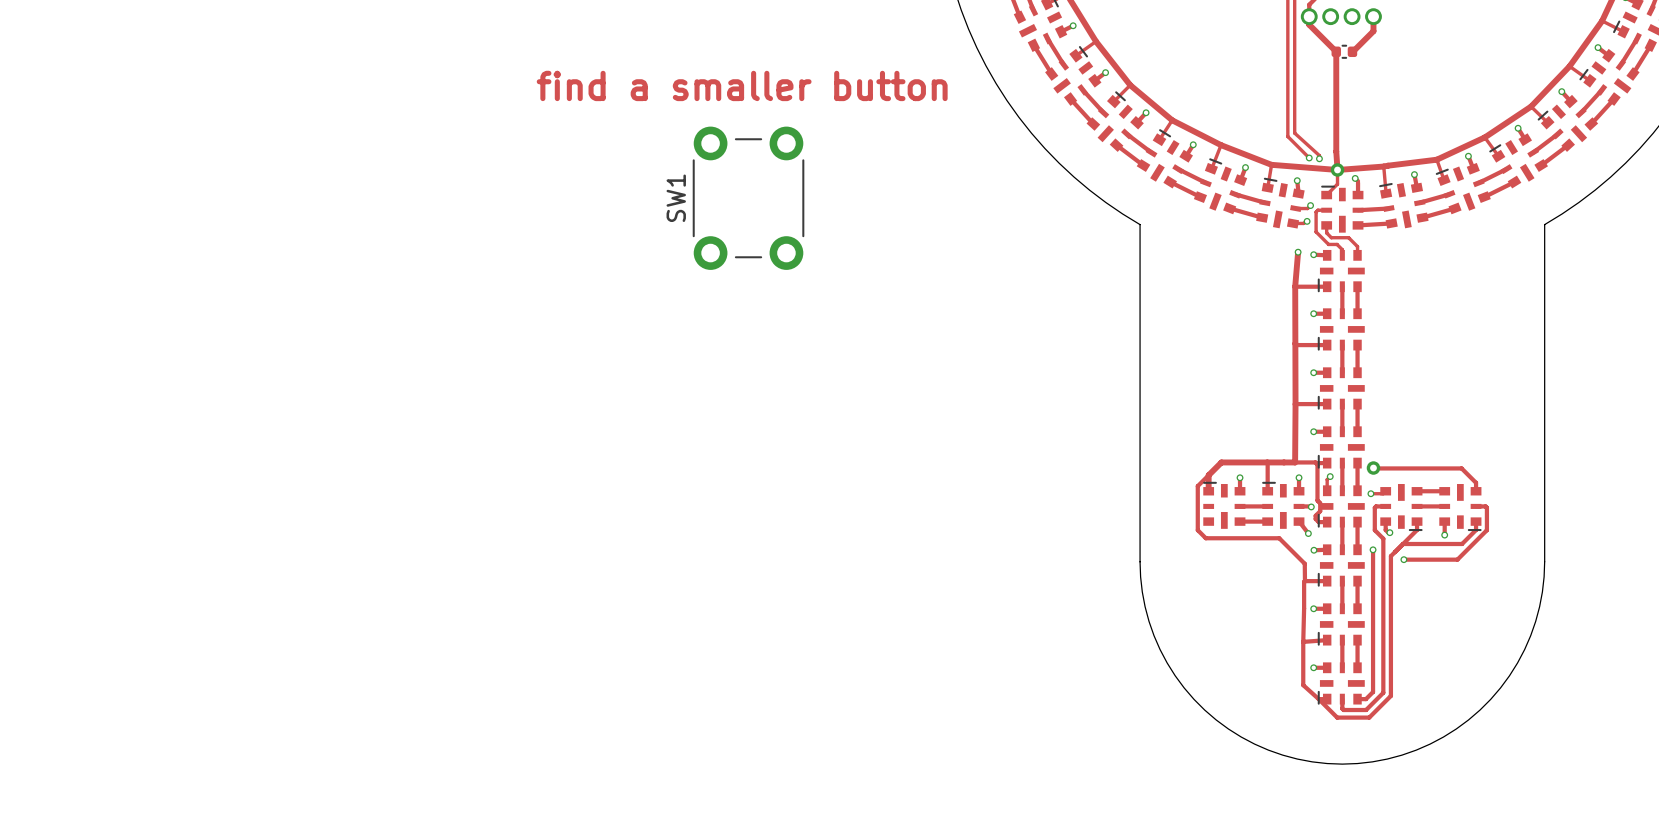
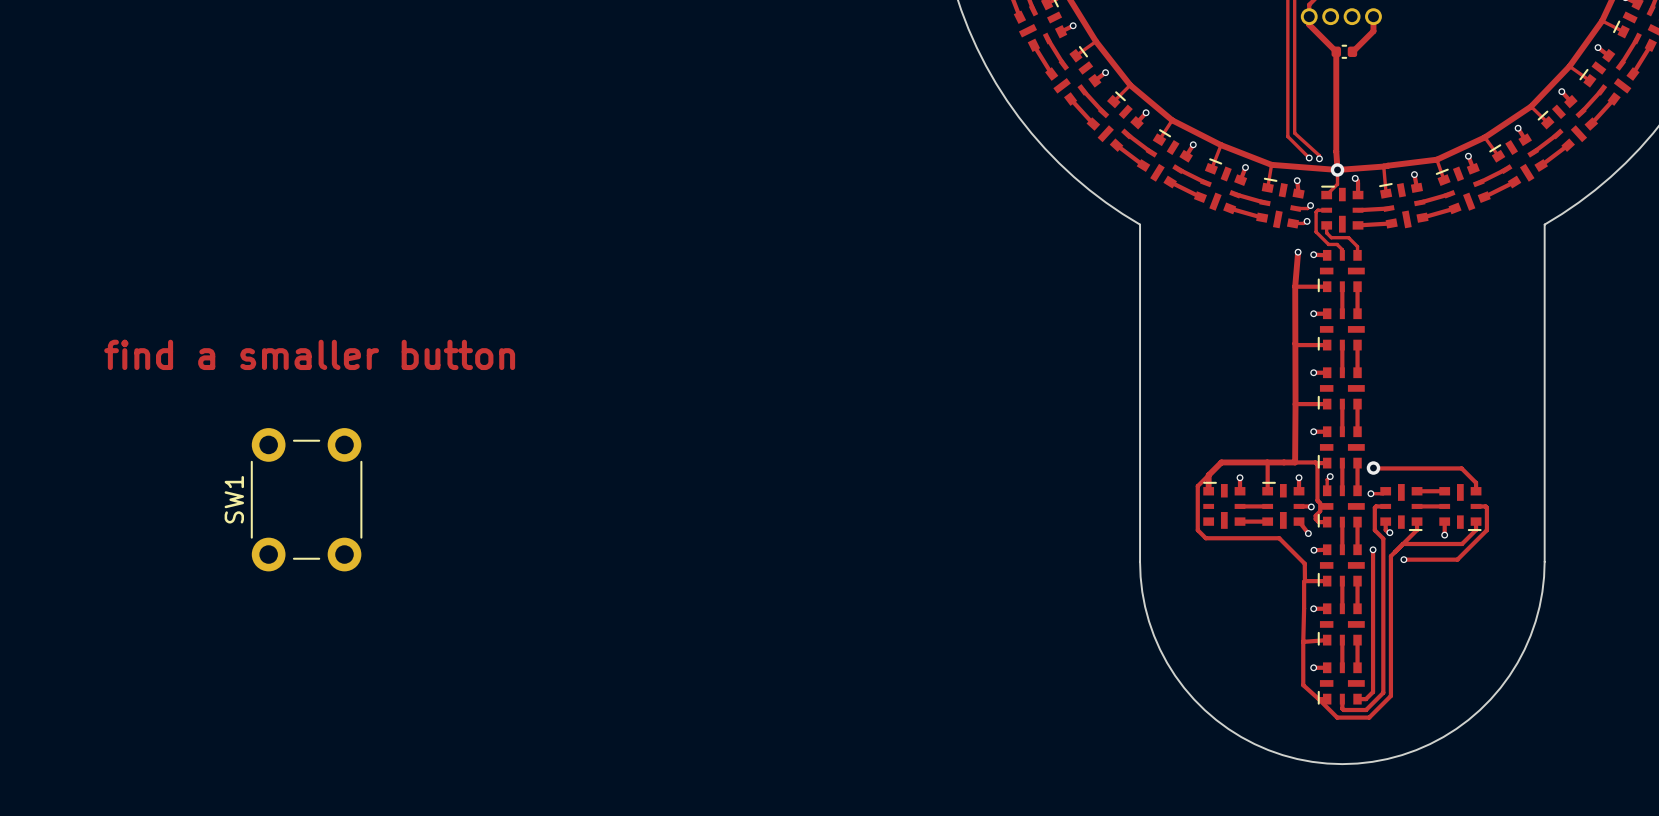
text: find a smaller button (742, 85) -> none
SW1 position: (748, 198) -> (306, 499)
text: none -> find a smaller button (309, 354)

